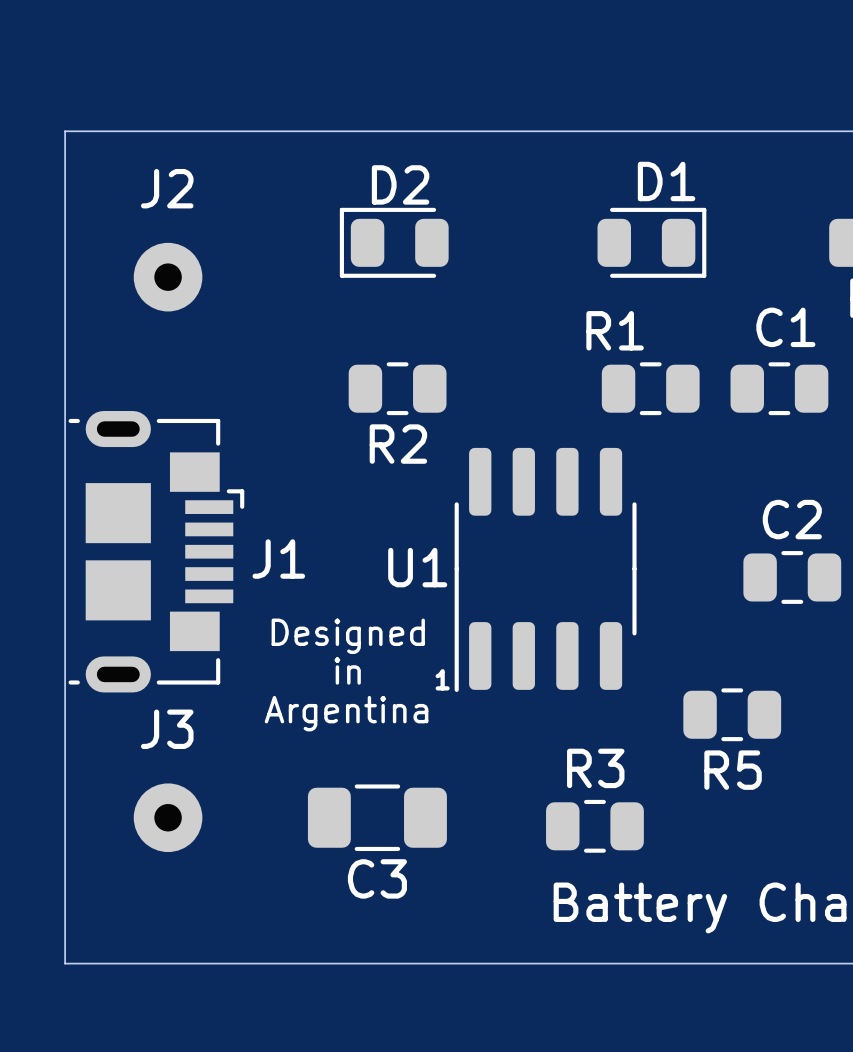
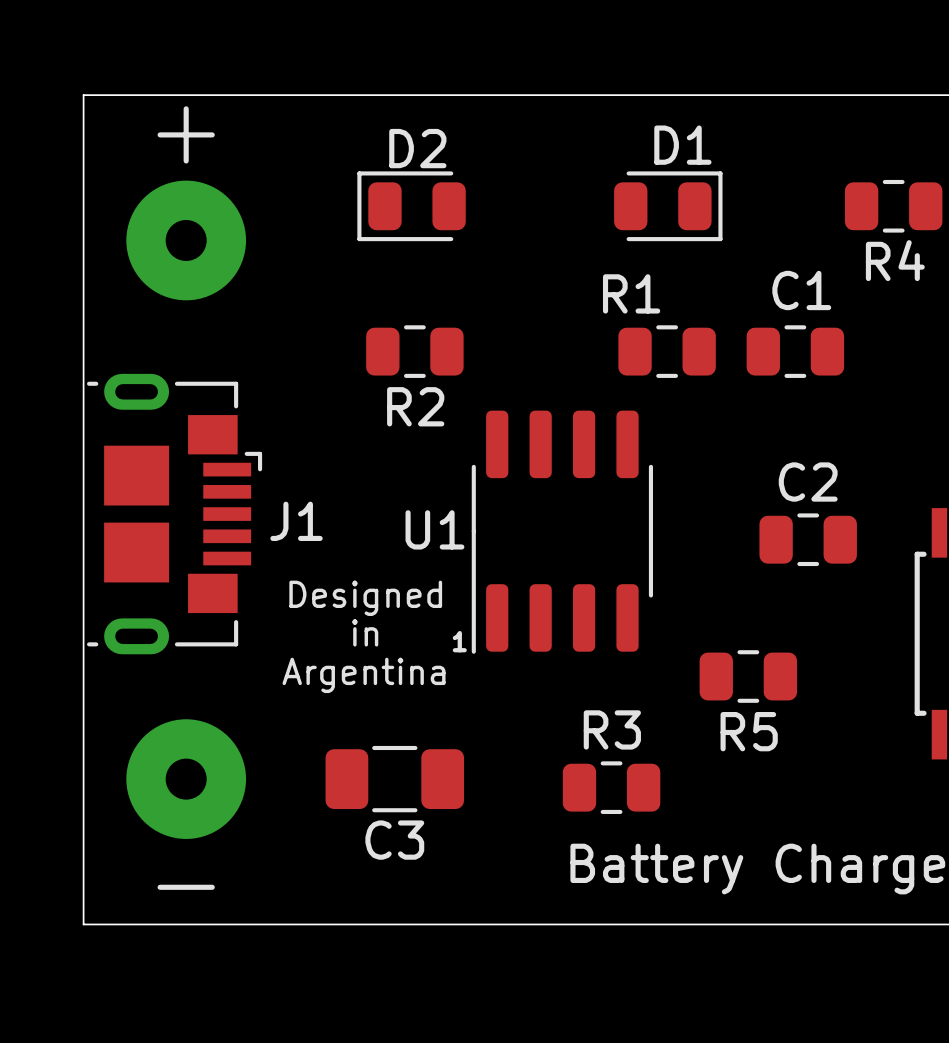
J2: (168, 277) -> none
part: none -> (186, 240)
J3: (168, 817) -> none
part: none -> (186, 779)

